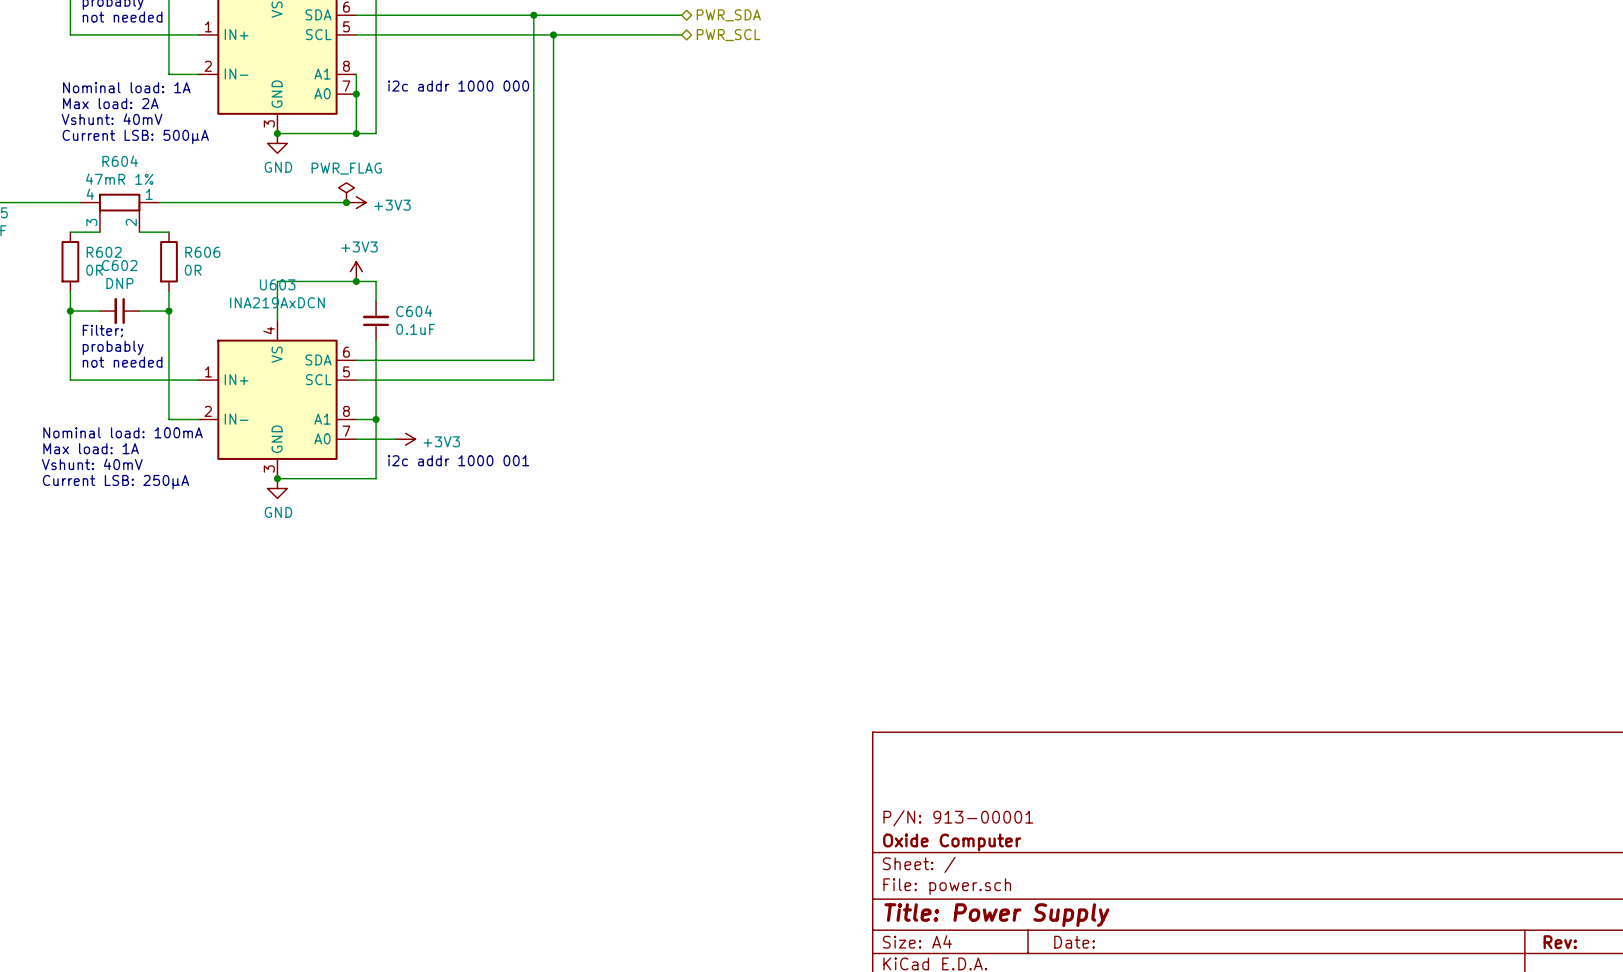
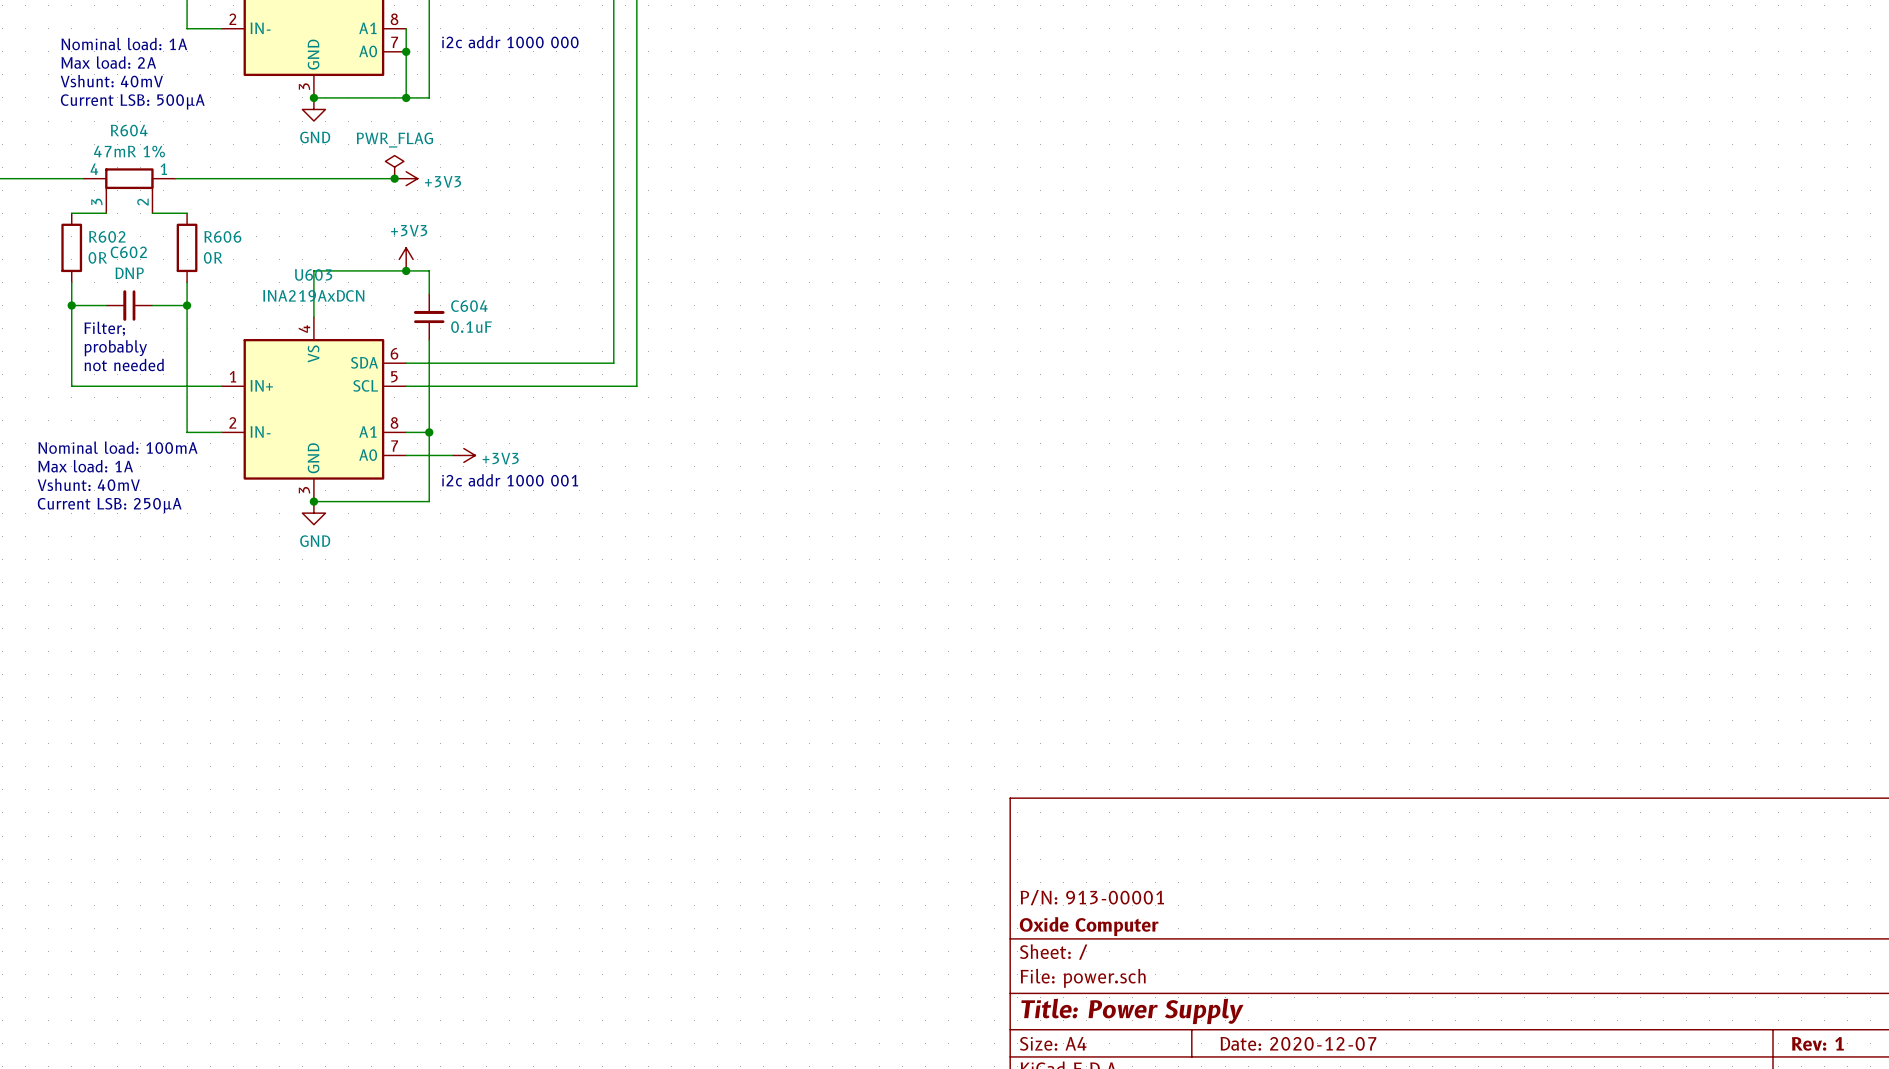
title block: Date: (1074, 942) -> Date: 2020-12-07 (1298, 1043)
title block: Rev: (1560, 942) -> Rev: 1 (1817, 1043)

